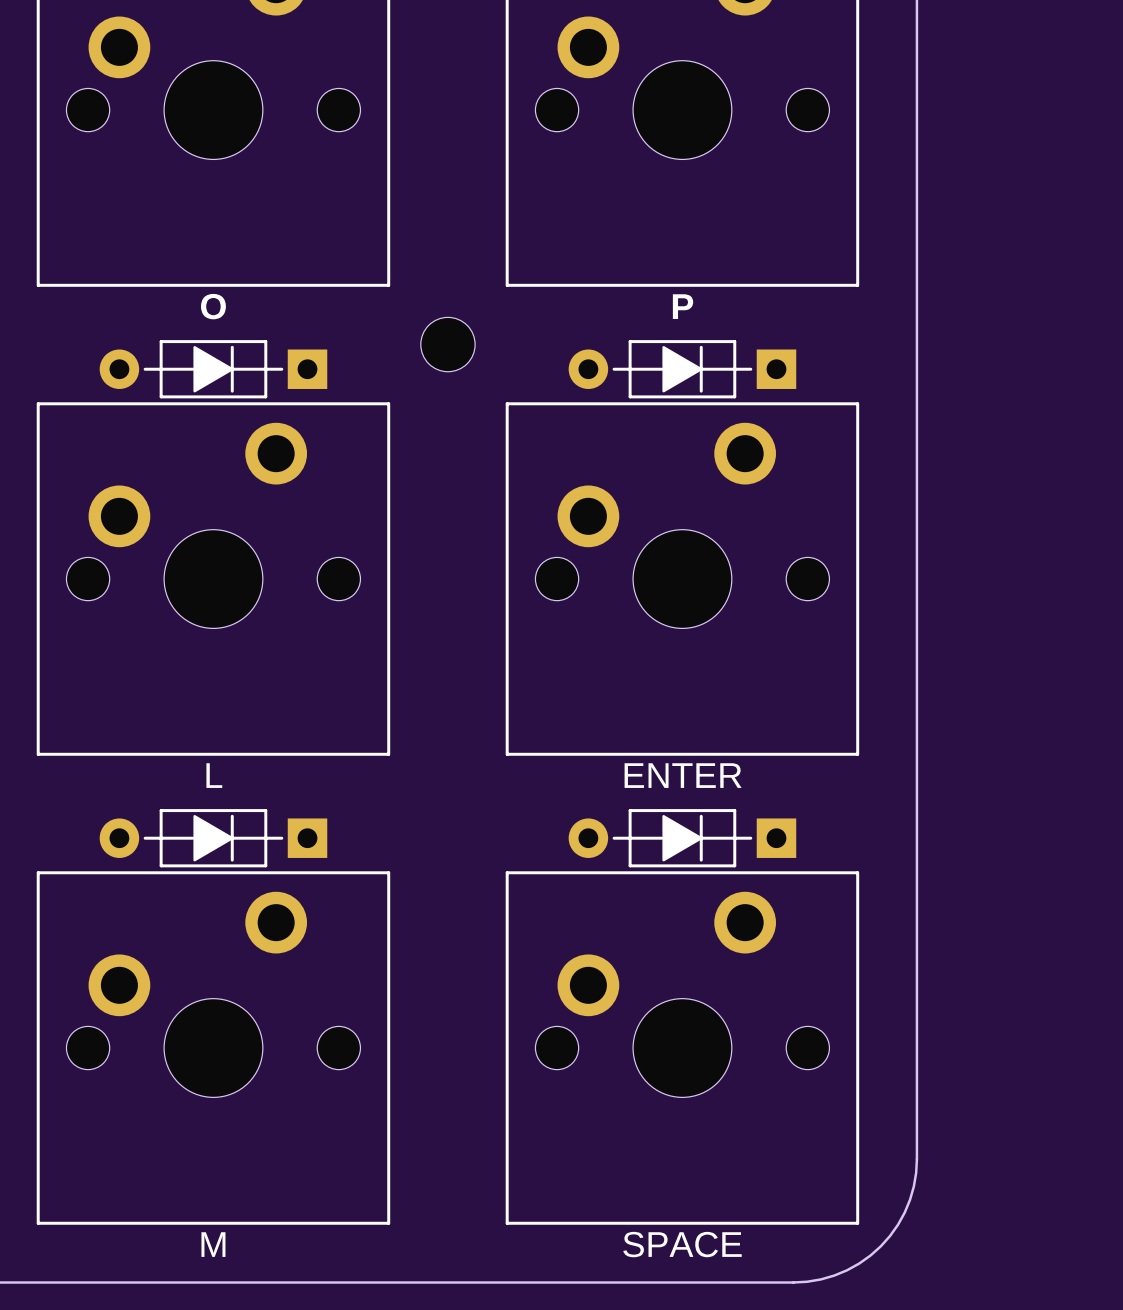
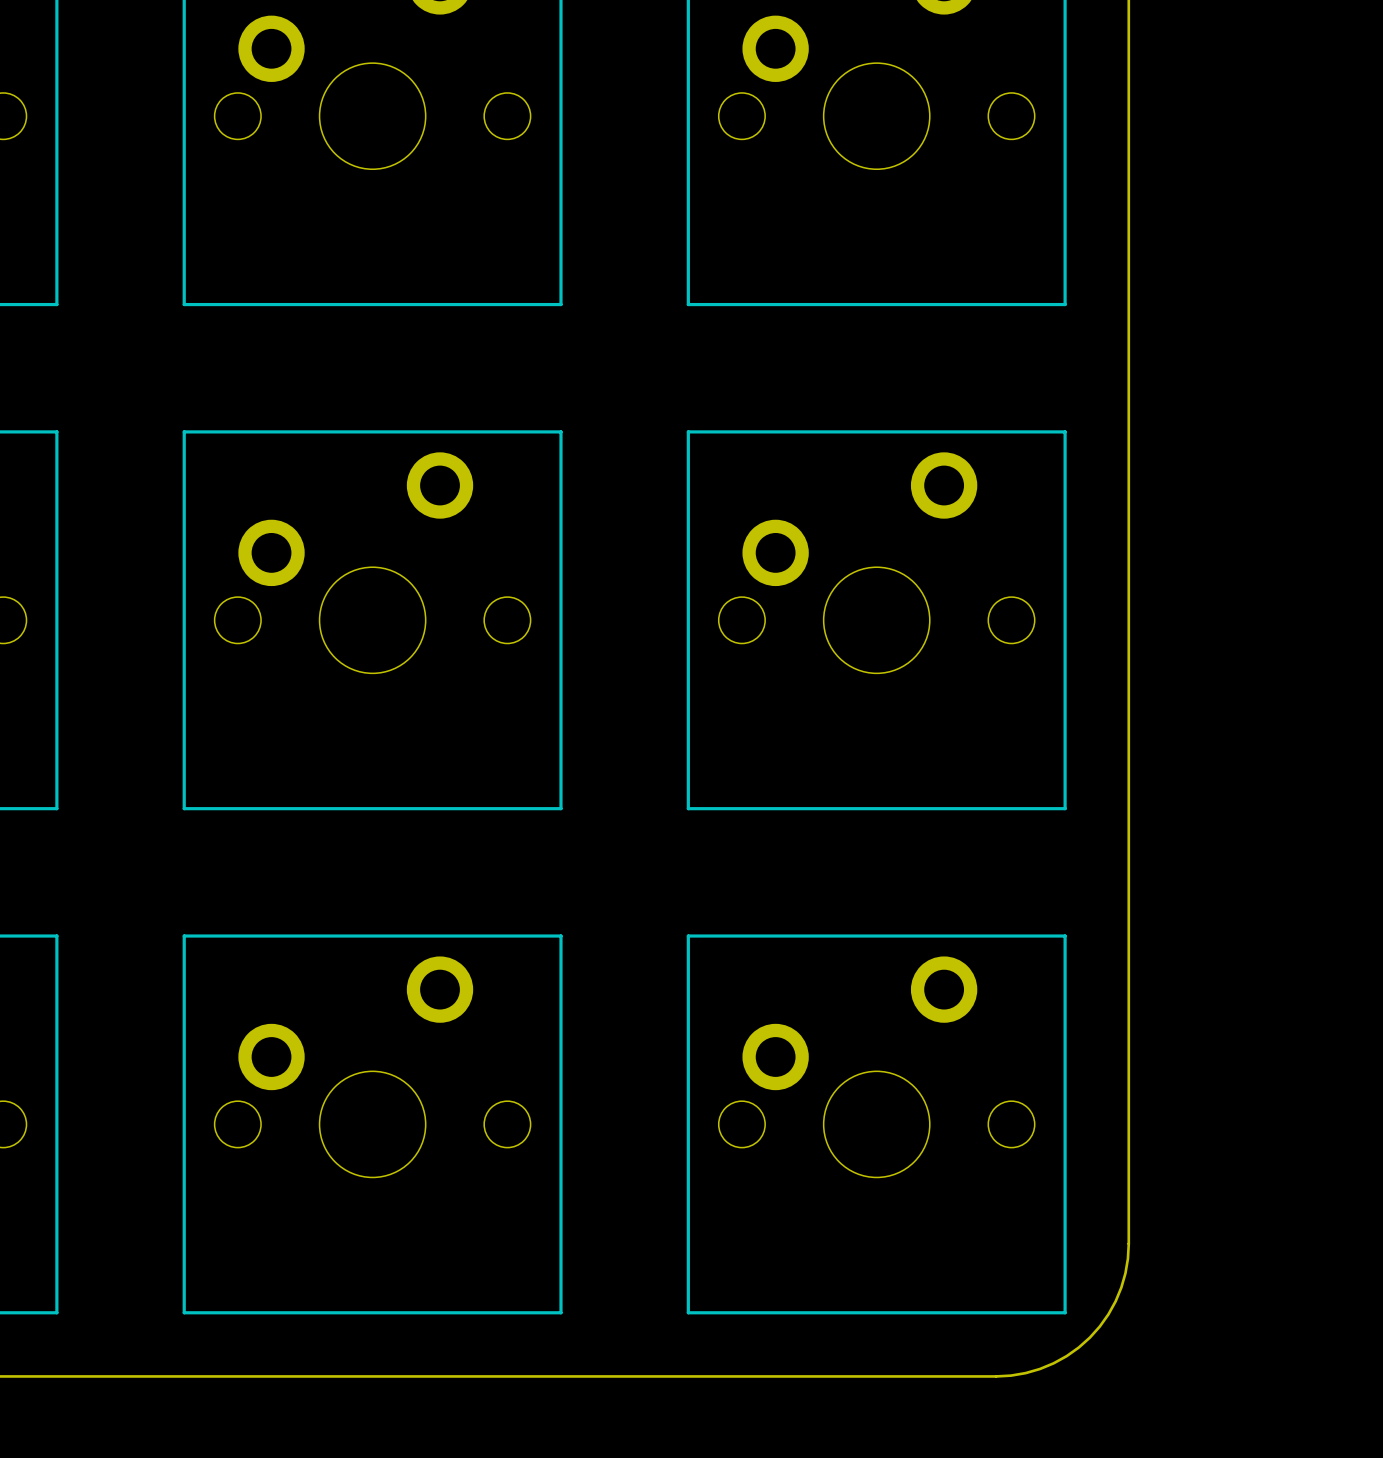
part value: O (213, 306) -> none
part value: P (683, 306) -> none
part: (447, 344) -> none
part: (213, 369) -> none
part: (682, 369) -> none
part value: L (214, 775) -> none
part value: ENTER (683, 775) -> none
part: (213, 838) -> none
part: (682, 838) -> none
part value: M (213, 1244) -> none
part value: SPACE (682, 1244) -> none

